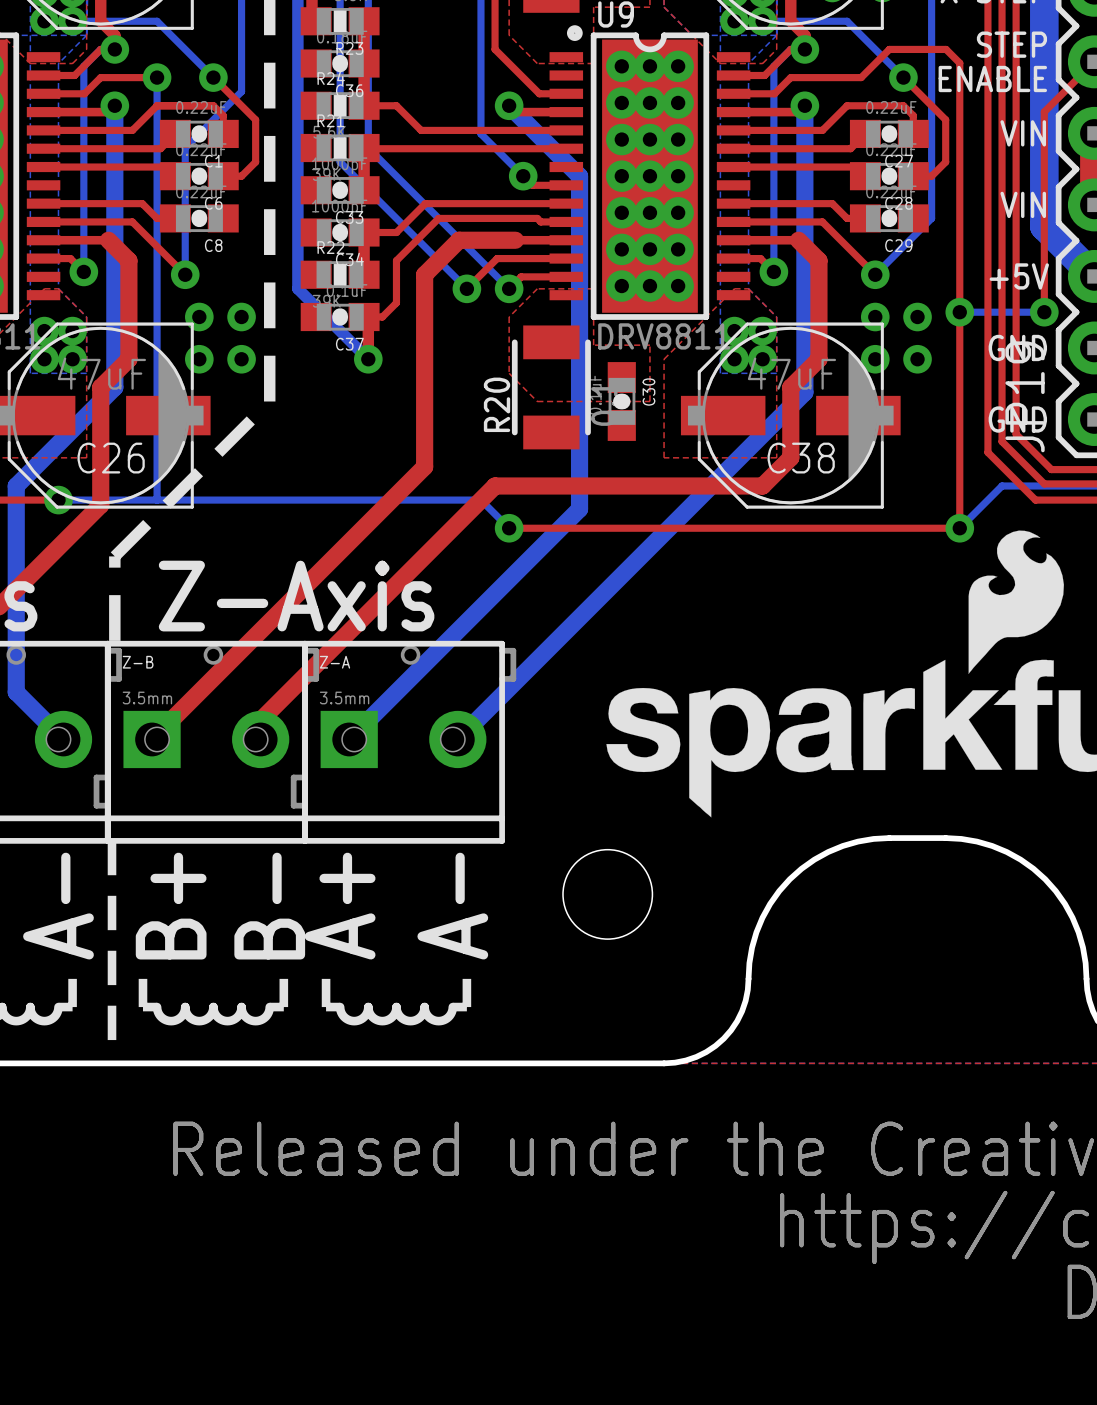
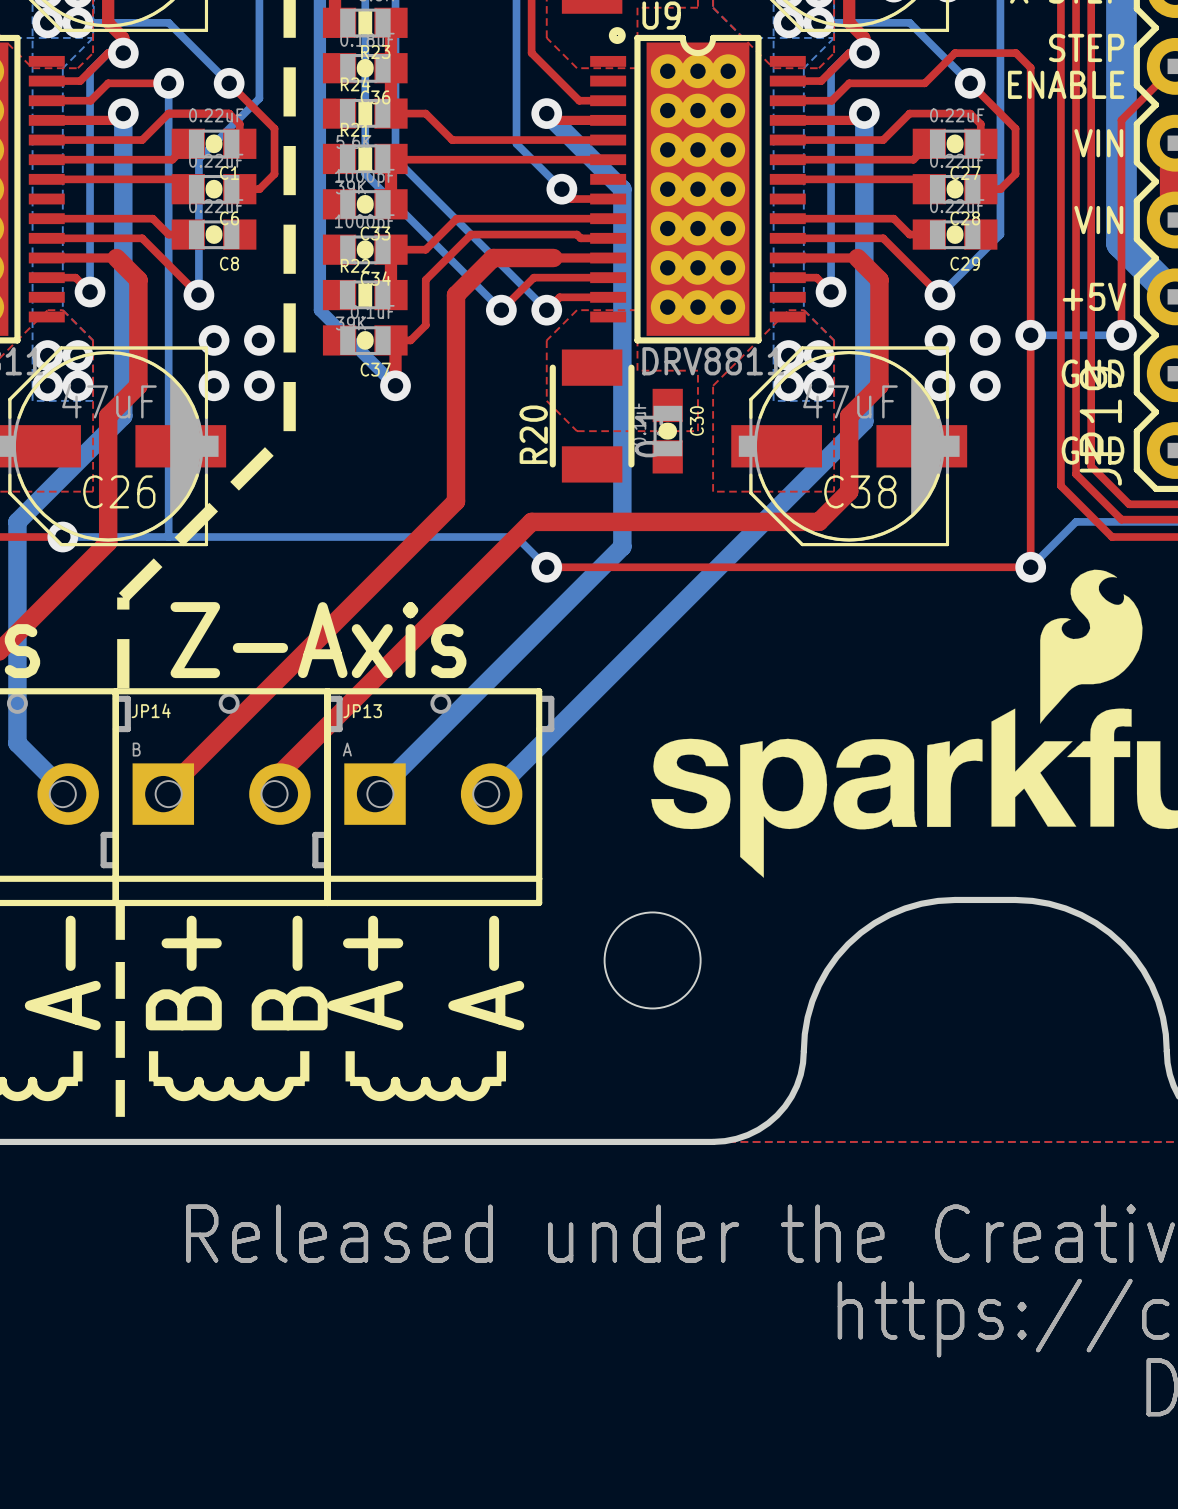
Z-B name: Z-B (138, 662) -> JP14 (151, 710)
Z-A name: Z-A (335, 662) -> JP13 (362, 711)
Z-B value: 3.5mm (147, 697) -> B (136, 749)
Z-A value: 3.5mm (344, 697) -> A (347, 749)

